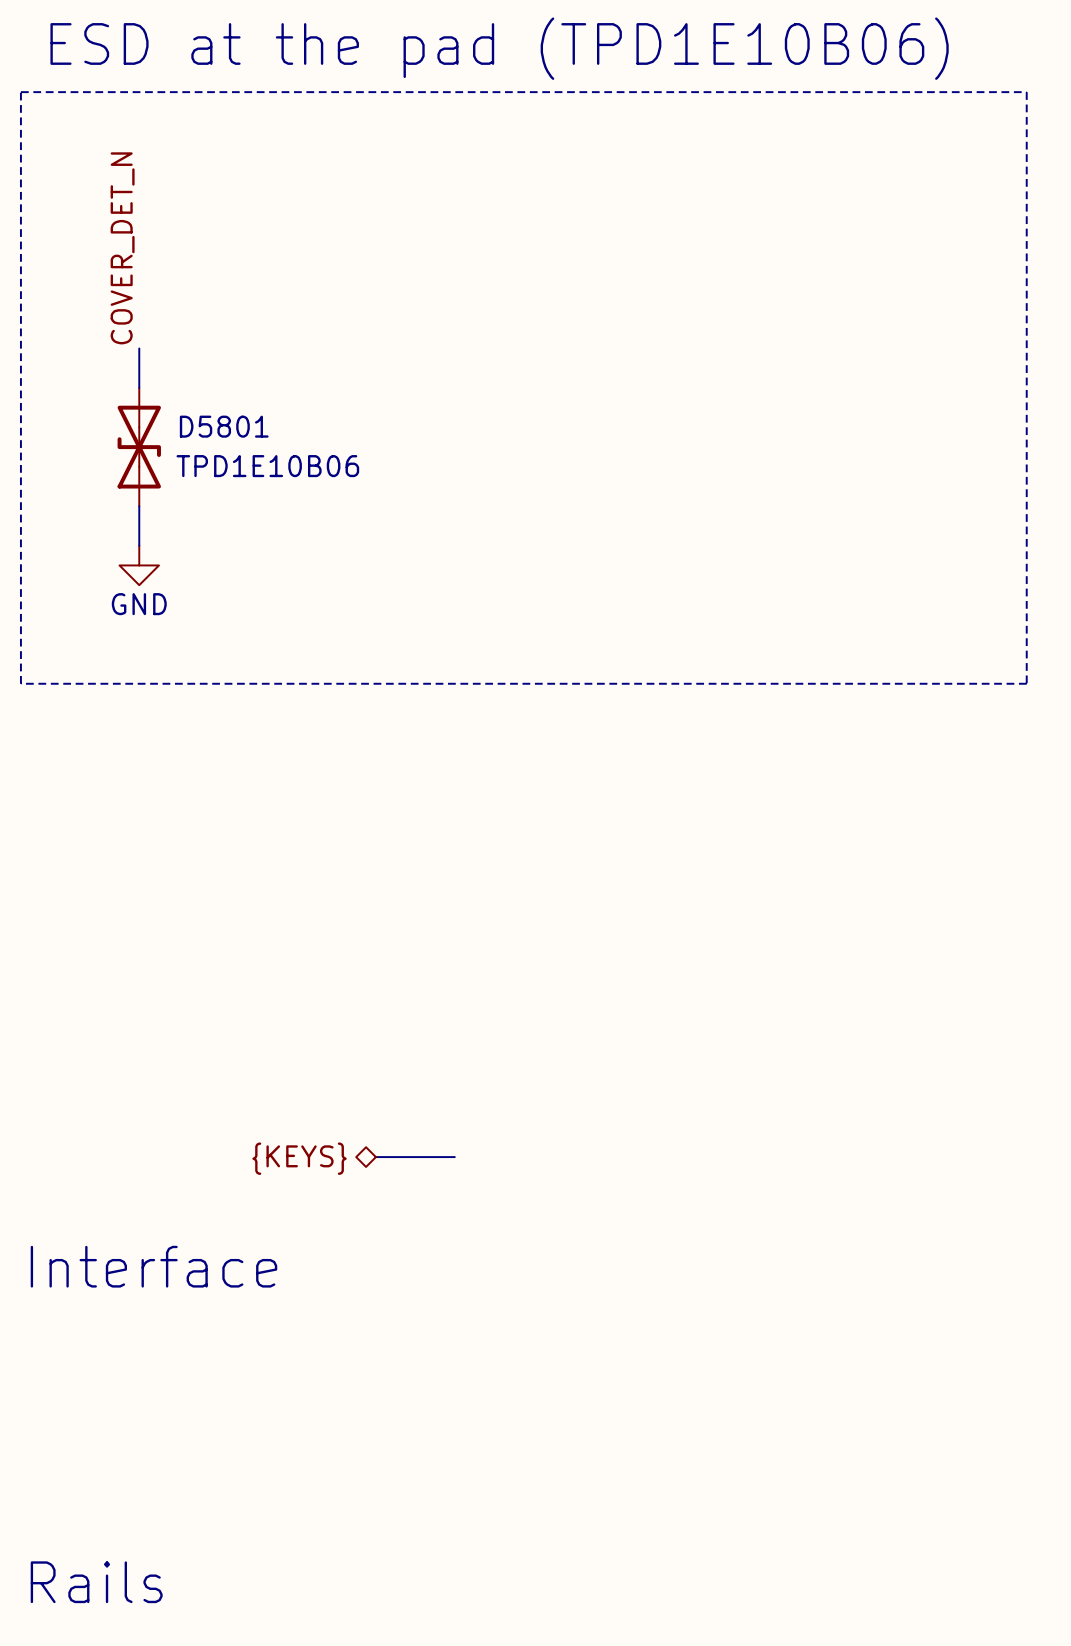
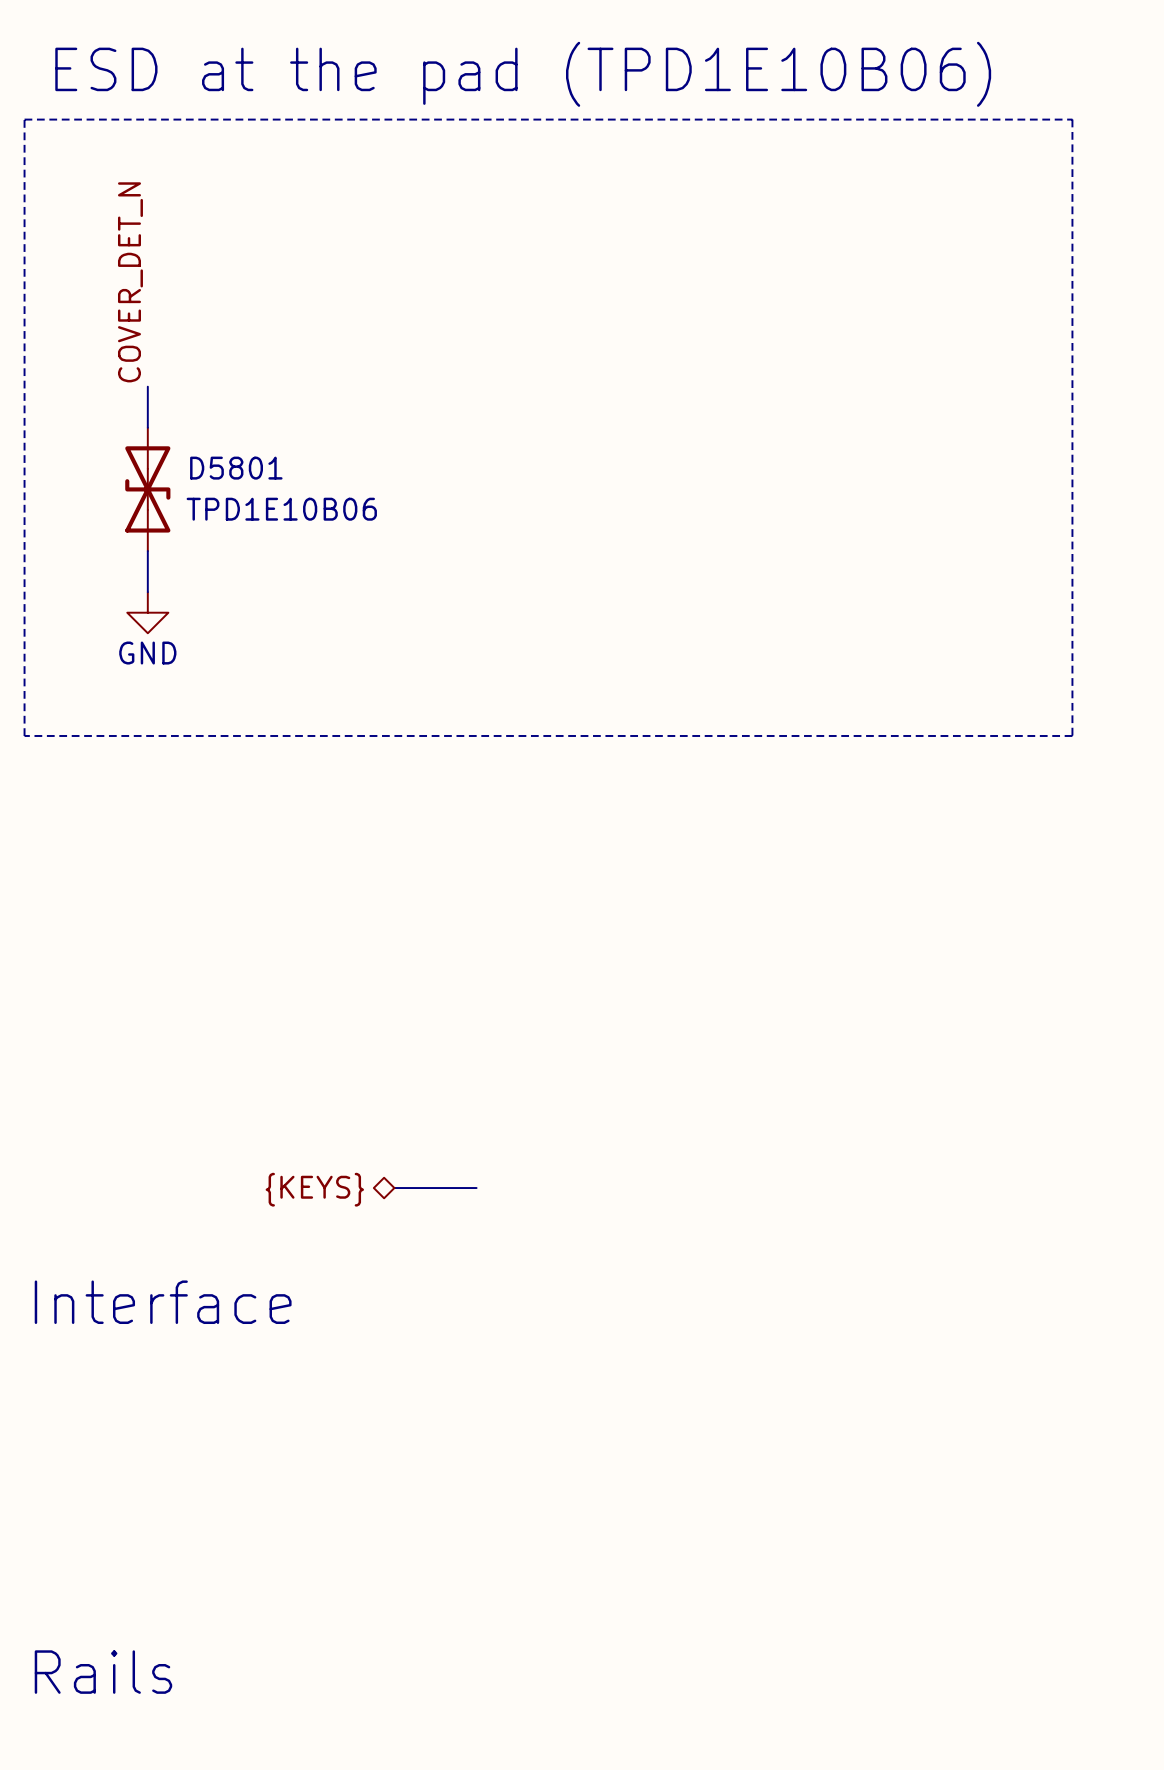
bus: (375, 1157) (454, 1157) -> (394, 1188) (476, 1188)
hierarchical label position: {KEYS} (299, 1158) -> {KEYS} (314, 1189)
text position: Interface (153, 1266) -> Interface (163, 1302)

